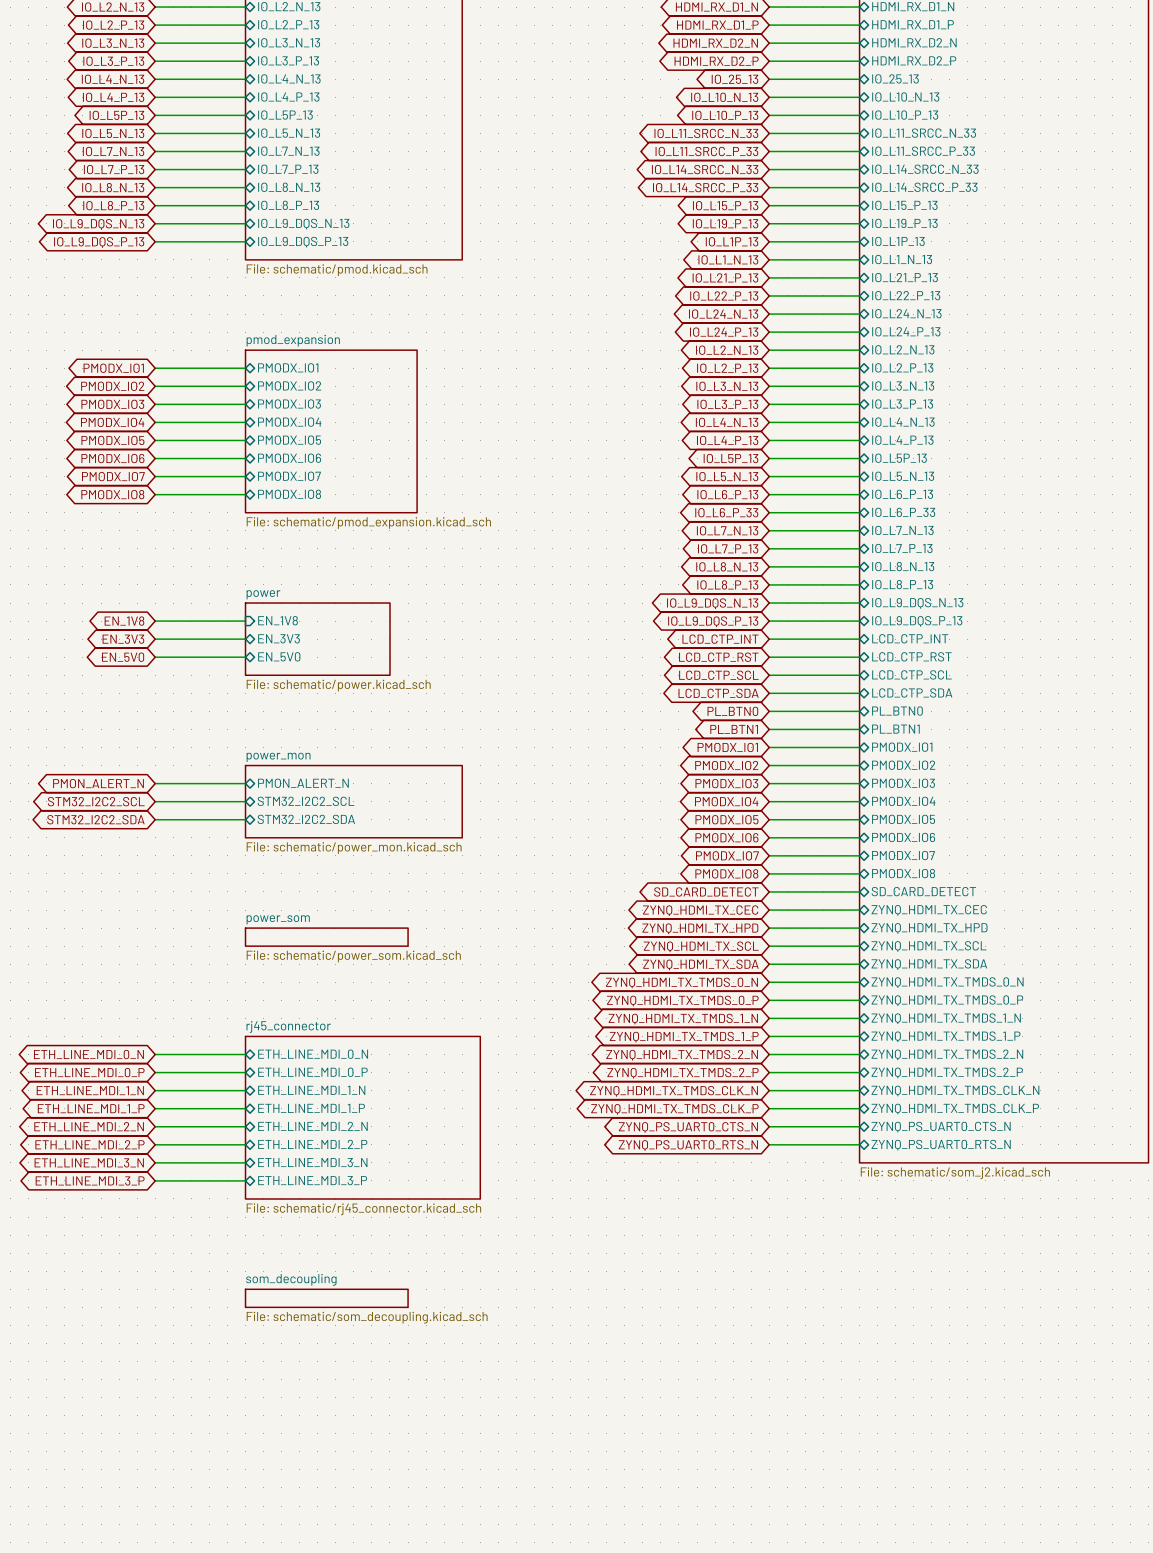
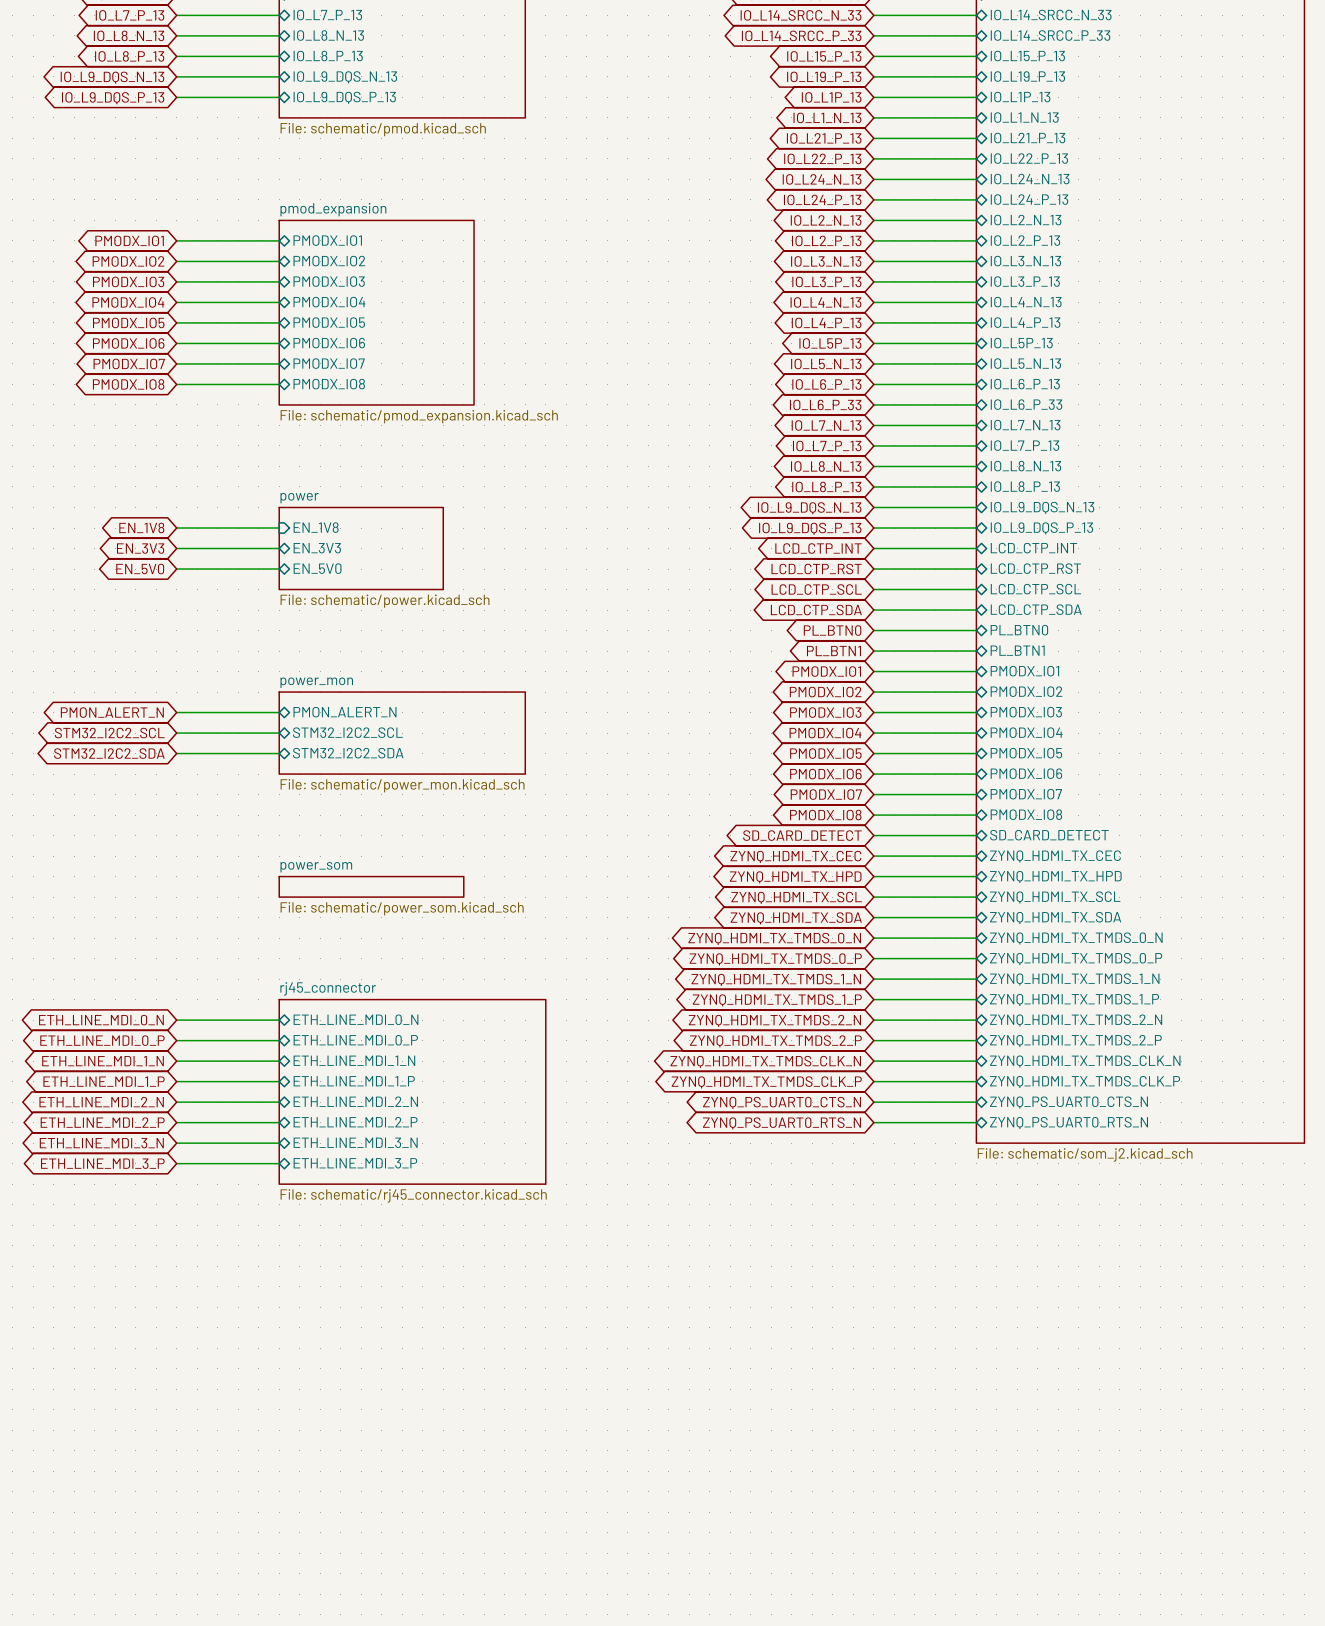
sheet som_decoupling: File: schematic/som_decoupling.kicad_sch (326, 1298) -> none

